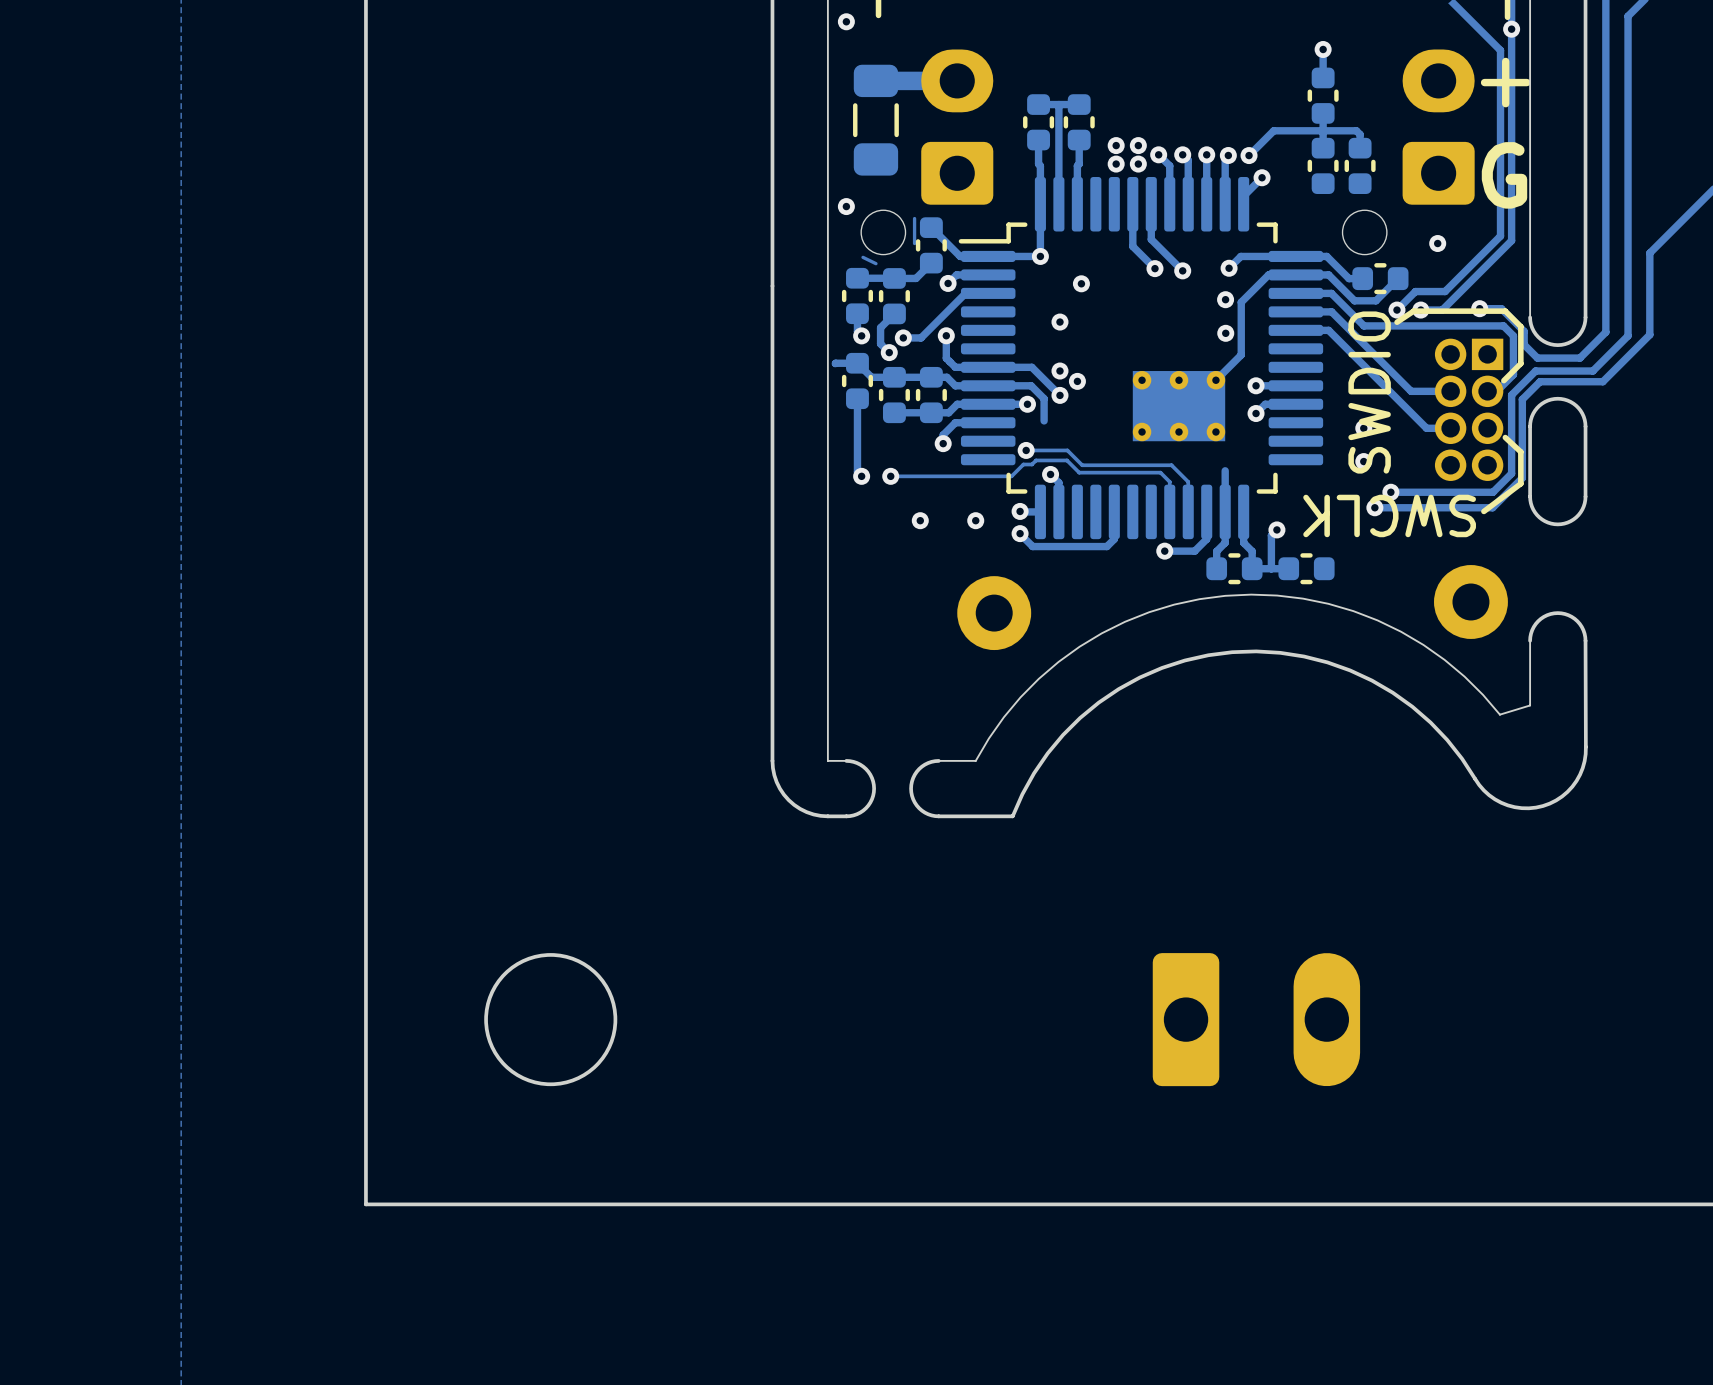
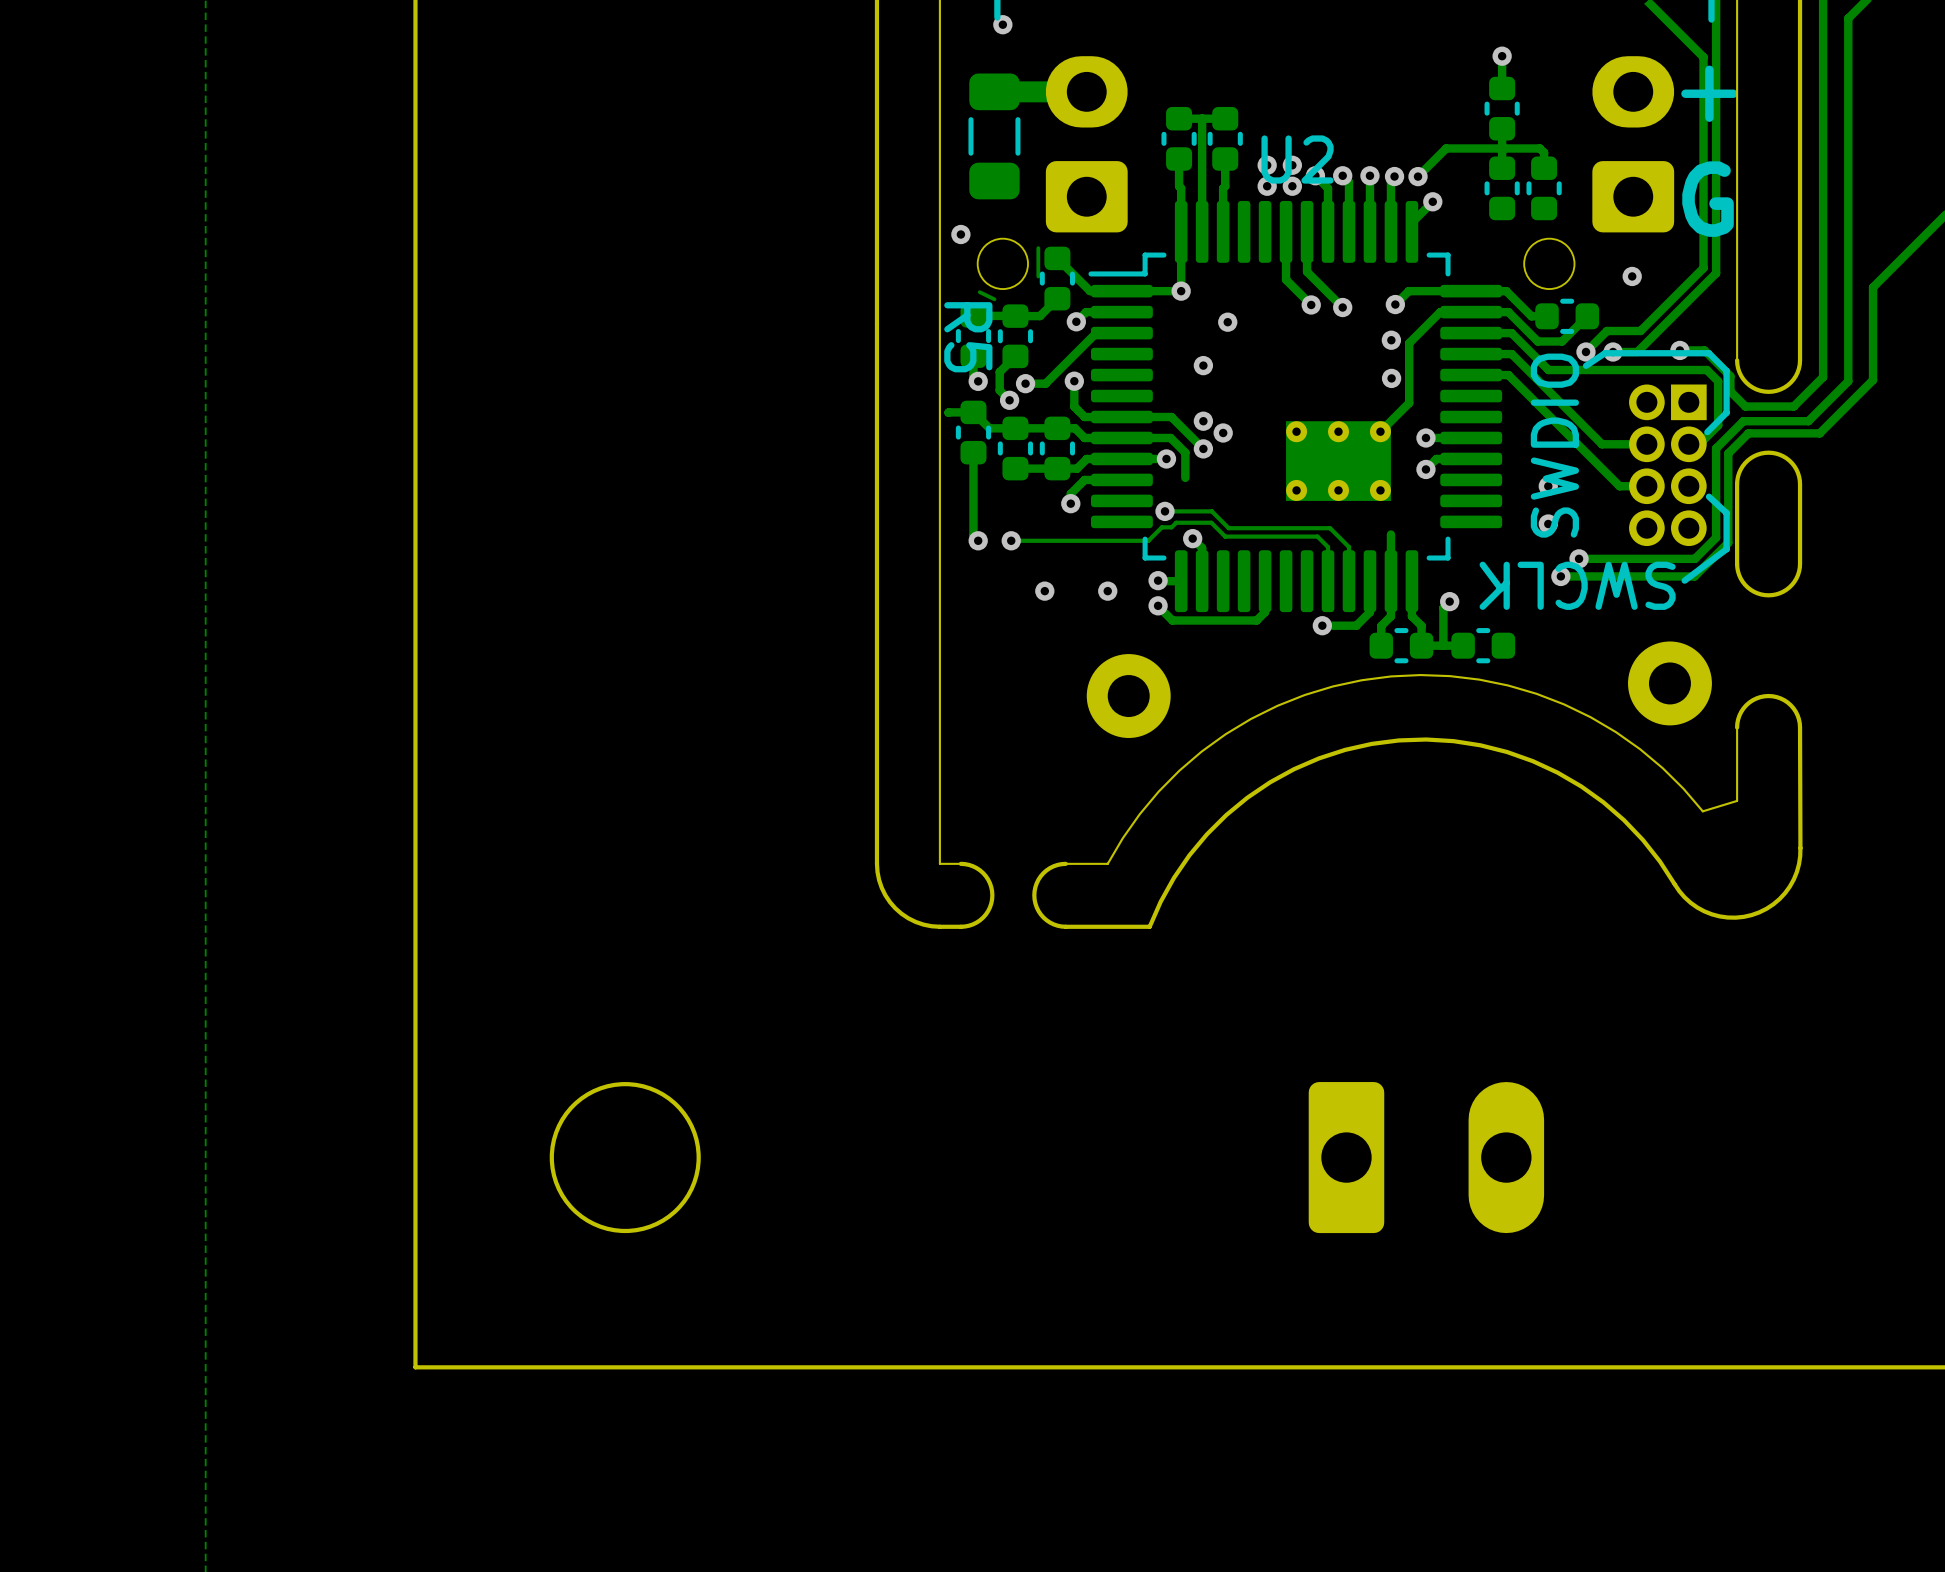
via position: (846, 21) -> (1002, 24)
via: (1511, 29) -> none
U2 name: none -> U2 (1297, 159)
R5 name: none -> R5 (968, 337)

